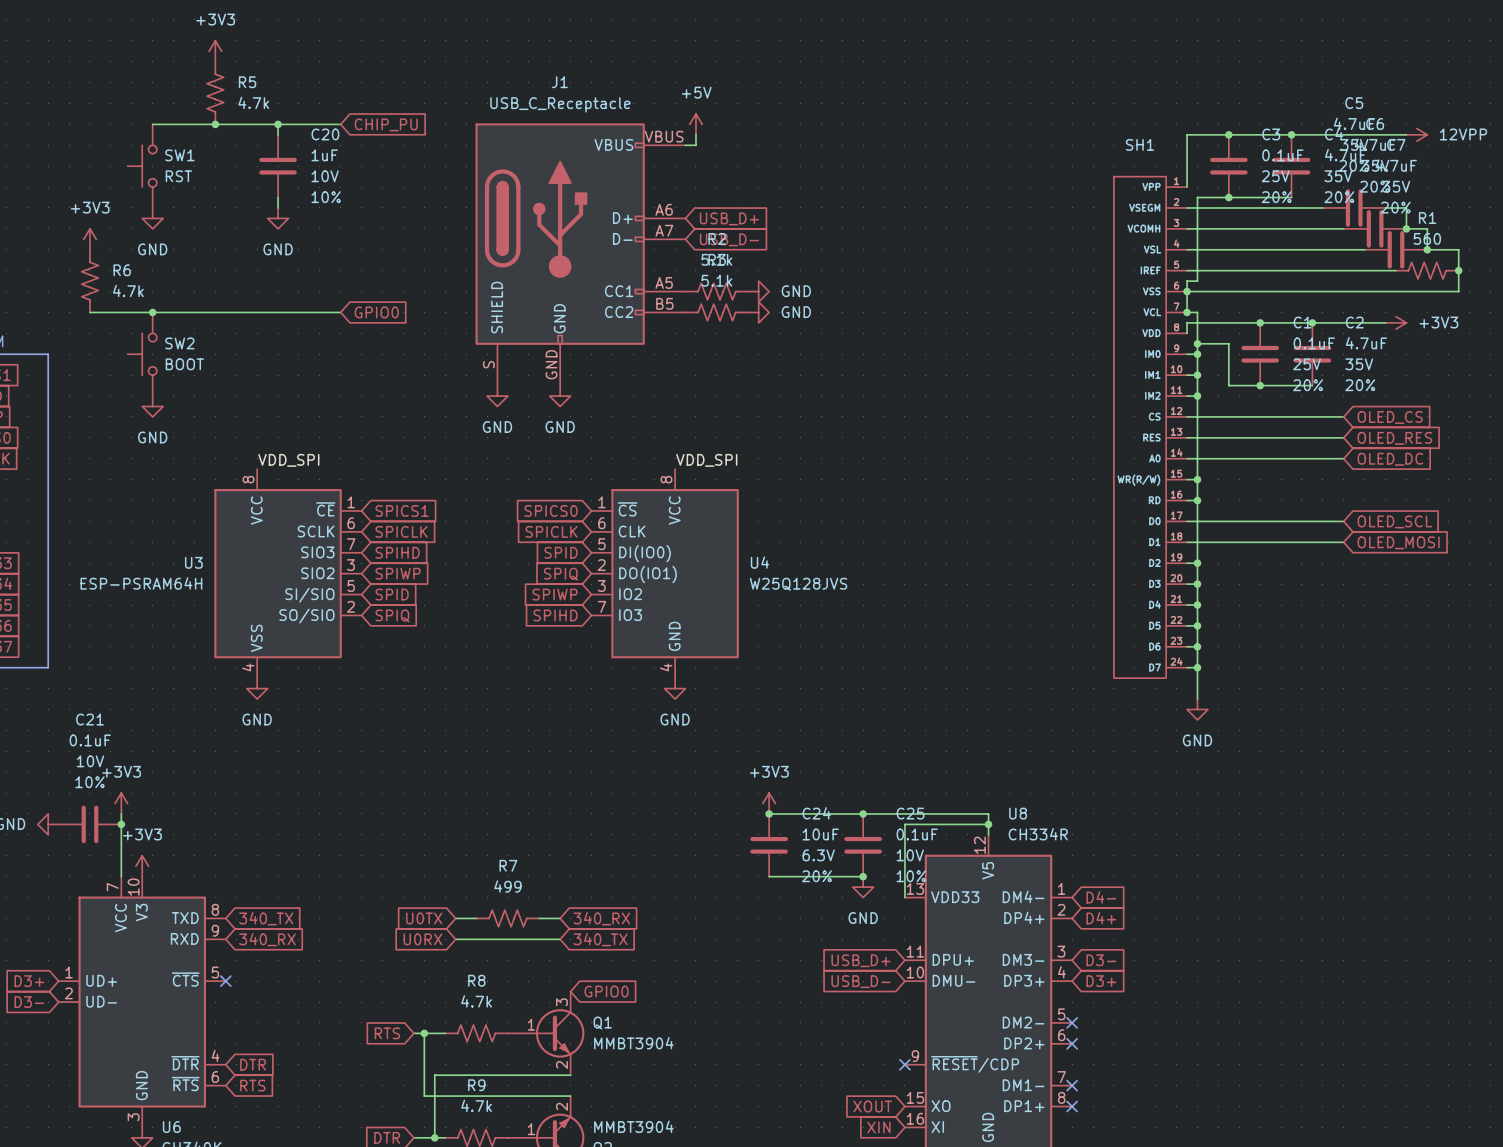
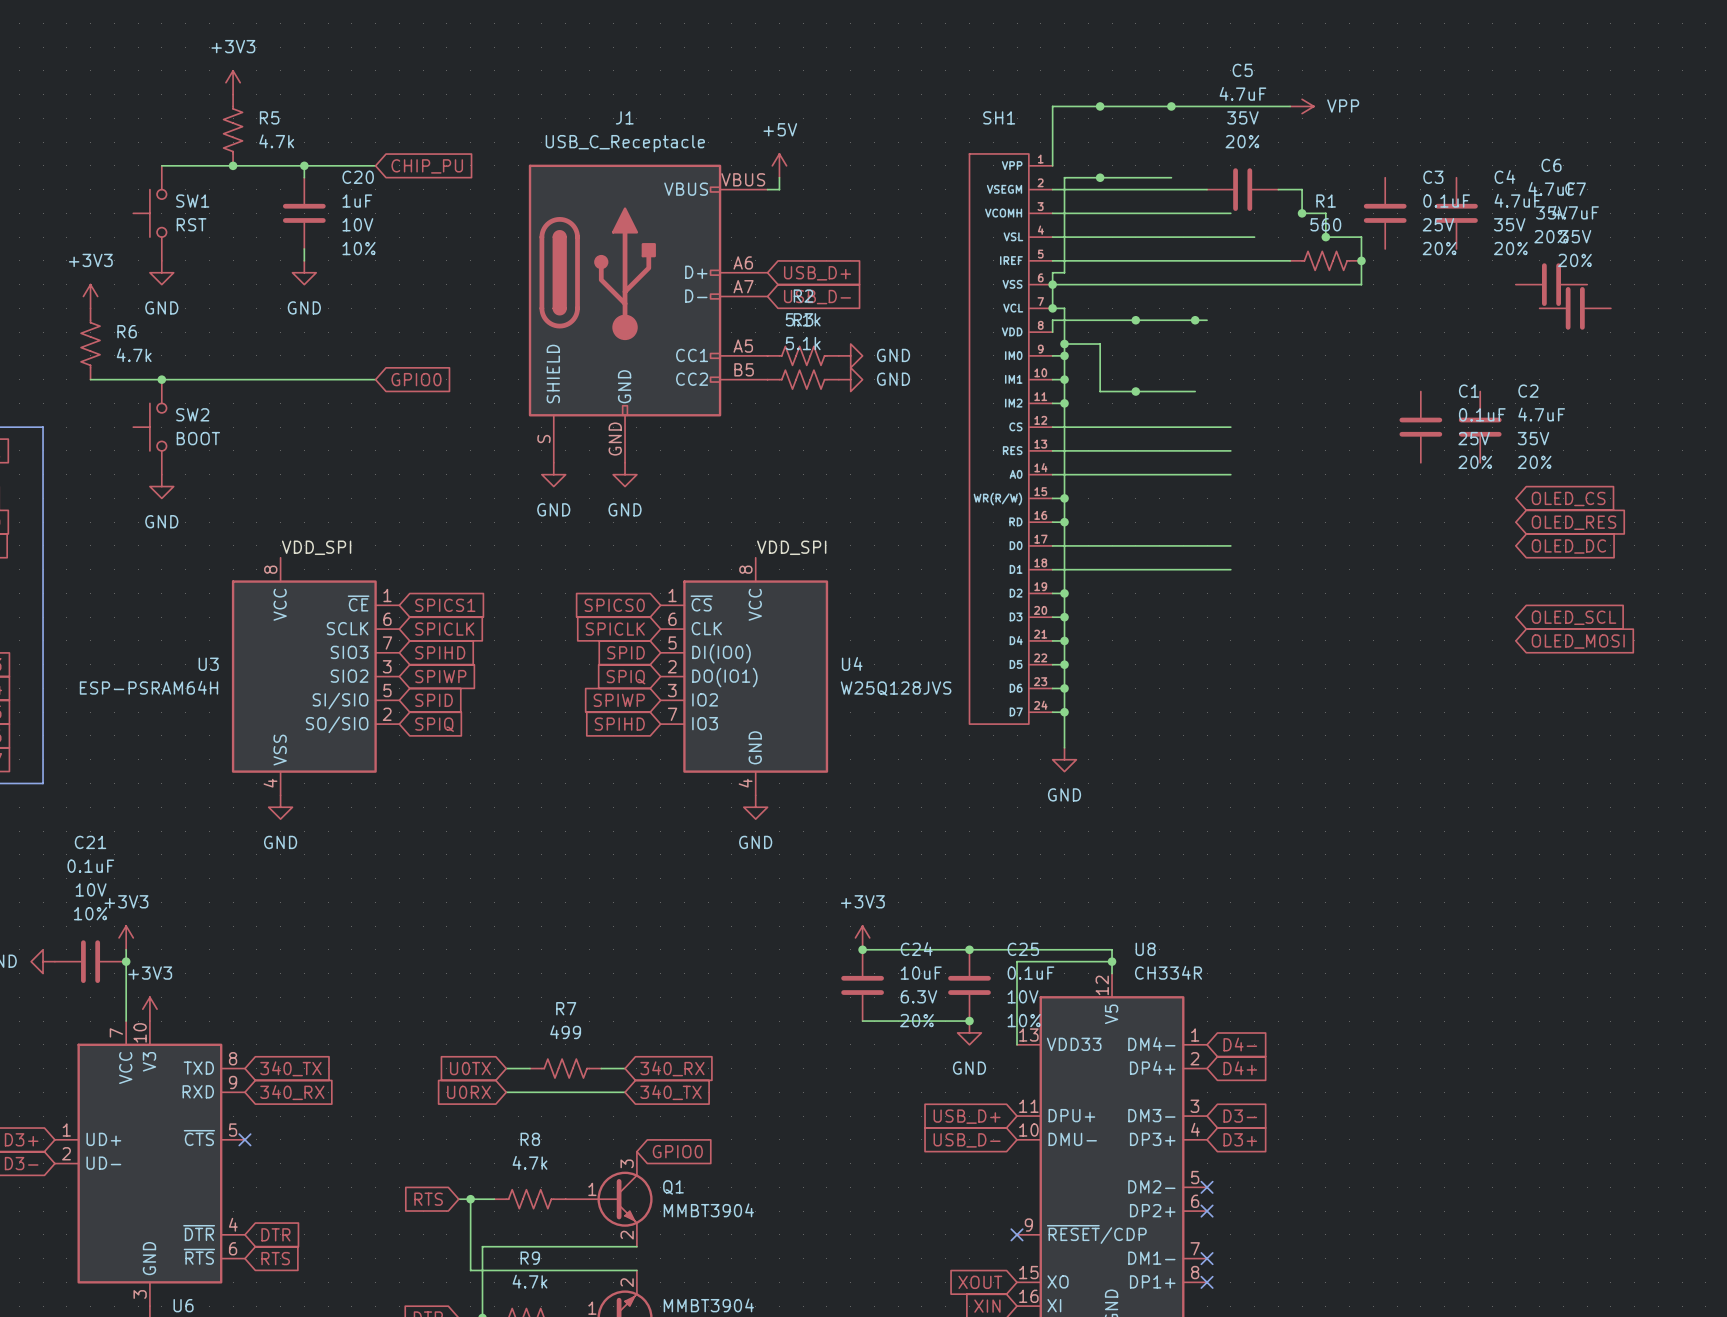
junction: none -> (1100, 106)
junction: none -> (1171, 106)
wire: none -> (1290, 106) (1052, 106) (1052, 165)
power symbol: none -> VPP (1302, 106)
junction: none -> (1100, 177)
wire: none -> (1171, 177) (1064, 177) (1064, 272) (1052, 272) (1052, 308) (1064, 308) (1064, 747)
junction: (1228, 134) -> none
junction: (1291, 134) -> none
wire: (1406, 134) (1187, 134) (1187, 187) -> none
power symbol: 12VPP (1416, 134) -> none
wire: none -> (1052, 189) (1207, 189)
wire: none -> (1052, 213) (1230, 213)
junction: none -> (1302, 213)
wire: none -> (1052, 237) (1254, 237)
junction: none -> (1325, 237)
junction position: (1228, 197) -> (1361, 260)
wire: (1291, 197) (1197, 197) (1197, 281) (1187, 281) (1187, 312) (1197, 312) (1197, 699) -> none
wire: none -> (1052, 260) (1290, 260)
wire: (1187, 207) (1322, 207) -> none
C5 position: (1354, 207) -> (1242, 189)
wire: (1385, 207) (1406, 207) (1406, 228) (1427, 228) (1427, 249) (1458, 249) (1458, 291) (1187, 291) -> none
wire: none -> (1052, 284) (1337, 284)
junction: none -> (1052, 284)
wire: (1207, 228) (1343, 228) -> (1361, 284) (1361, 237) (1325, 237) (1325, 213) (1302, 213) (1302, 189) (1278, 189)
junction: (1406, 228) -> none
junction: none -> (1052, 308)
wire: (1187, 249) (1364, 249) -> none
junction: (1427, 249) -> none
junction: none -> (1135, 320)
junction: none -> (1195, 320)
wire: none -> (1207, 320) (1052, 320) (1052, 332)
wire: (1187, 270) (1396, 270) -> none
R1 position: (1427, 270) -> (1325, 260)
junction: (1458, 270) -> none
wire: none -> (1064, 344) (1100, 344) (1100, 391) (1195, 391)
junction: none -> (1064, 344)
wire: none -> (1052, 355) (1064, 355)
junction: none -> (1064, 355)
junction: (1187, 291) -> none
wire: none -> (1052, 379) (1064, 379)
junction: none -> (1064, 379)
junction: (1187, 312) -> none
junction: none -> (1135, 391)
junction: (1260, 322) -> none
junction: (1312, 322) -> none
wire: (1385, 322) (1187, 322) (1187, 333) -> none
power symbol: +3V3 (1396, 322) -> none
wire: none -> (1052, 403) (1064, 403)
junction: none -> (1064, 403)
wire: (1197, 343) (1228, 343) (1228, 385) (1312, 385) -> none
junction: (1197, 343) -> none
wire: none -> (1052, 427) (1230, 427)
wire: (1187, 354) (1197, 354) -> none
junction: (1197, 354) -> none
wire: none -> (1052, 450) (1230, 450)
wire: (1187, 375) (1197, 375) -> none
junction: (1197, 375) -> none
junction: (1260, 385) -> none
wire: none -> (1052, 474) (1230, 474)
wire: (1187, 396) (1197, 396) -> none
junction: (1197, 396) -> none
wire: none -> (1052, 498) (1064, 498)
junction: none -> (1064, 498)
wire: (1187, 416) (1343, 416) -> none
SH1 position: (1150, 427) -> (1011, 439)
wire: none -> (1052, 522) (1064, 522)
junction: none -> (1064, 522)
wire: (1187, 437) (1343, 437) -> none
wire: none -> (1052, 545) (1230, 545)
wire: (1187, 458) (1343, 458) -> none
wire: none -> (1052, 569) (1230, 569)
wire: (1187, 479) (1197, 479) -> none
junction: (1197, 479) -> none
wire: none -> (1052, 593) (1064, 593)
junction: none -> (1064, 593)
wire: (1187, 500) (1197, 500) -> none
junction: (1197, 500) -> none
wire: none -> (1052, 617) (1064, 617)
junction: none -> (1064, 617)
wire: (1187, 521) (1343, 521) -> none
wire: none -> (1052, 640) (1064, 640)
junction: none -> (1064, 640)
wire: (1187, 542) (1343, 542) -> none
wire: none -> (1052, 664) (1064, 664)
junction: none -> (1064, 664)
wire: (1187, 563) (1197, 563) -> none
junction: (1197, 563) -> none
wire: none -> (1052, 688) (1064, 688)
junction: none -> (1064, 688)
wire: (1187, 584) (1197, 584) -> none
junction: (1197, 584) -> none
wire: none -> (1052, 712) (1064, 712)
junction: none -> (1064, 712)
wire: (1187, 605) (1197, 605) -> none
junction: (1197, 605) -> none
wire: (1187, 625) (1197, 625) -> none
junction: (1197, 625) -> none
power symbol: none -> GND (1064, 759)
wire: (1187, 646) (1197, 646) -> none
junction: (1197, 646) -> none
wire: (1187, 667) (1197, 667) -> none
junction: (1197, 667) -> none
power symbol: GND (1197, 709) -> none

